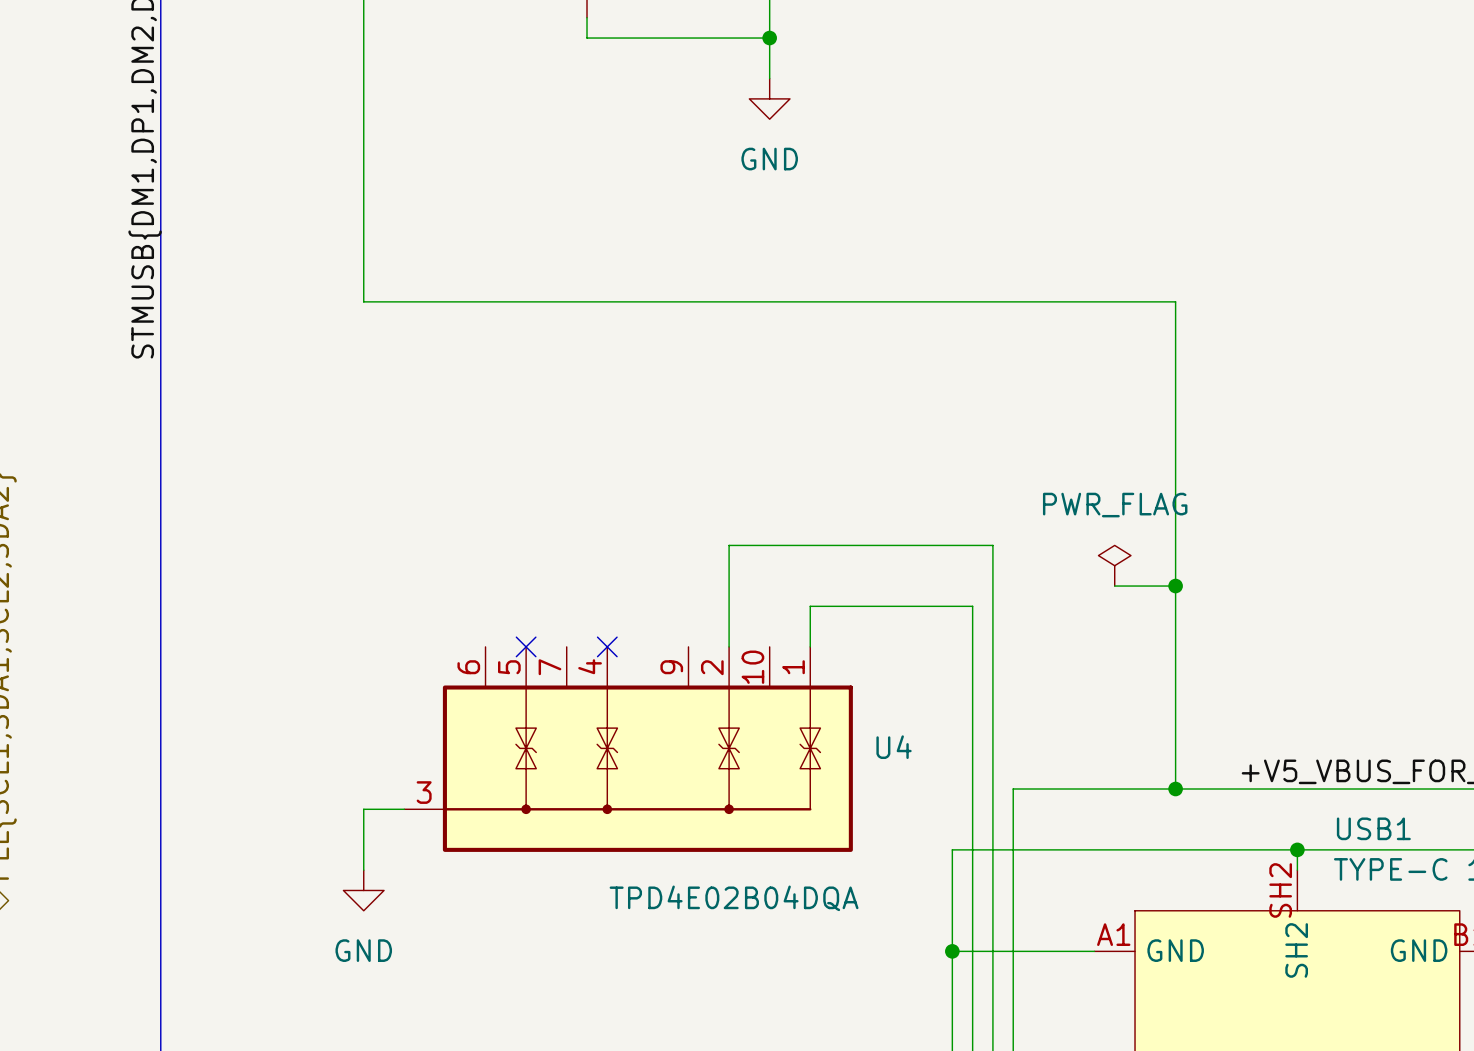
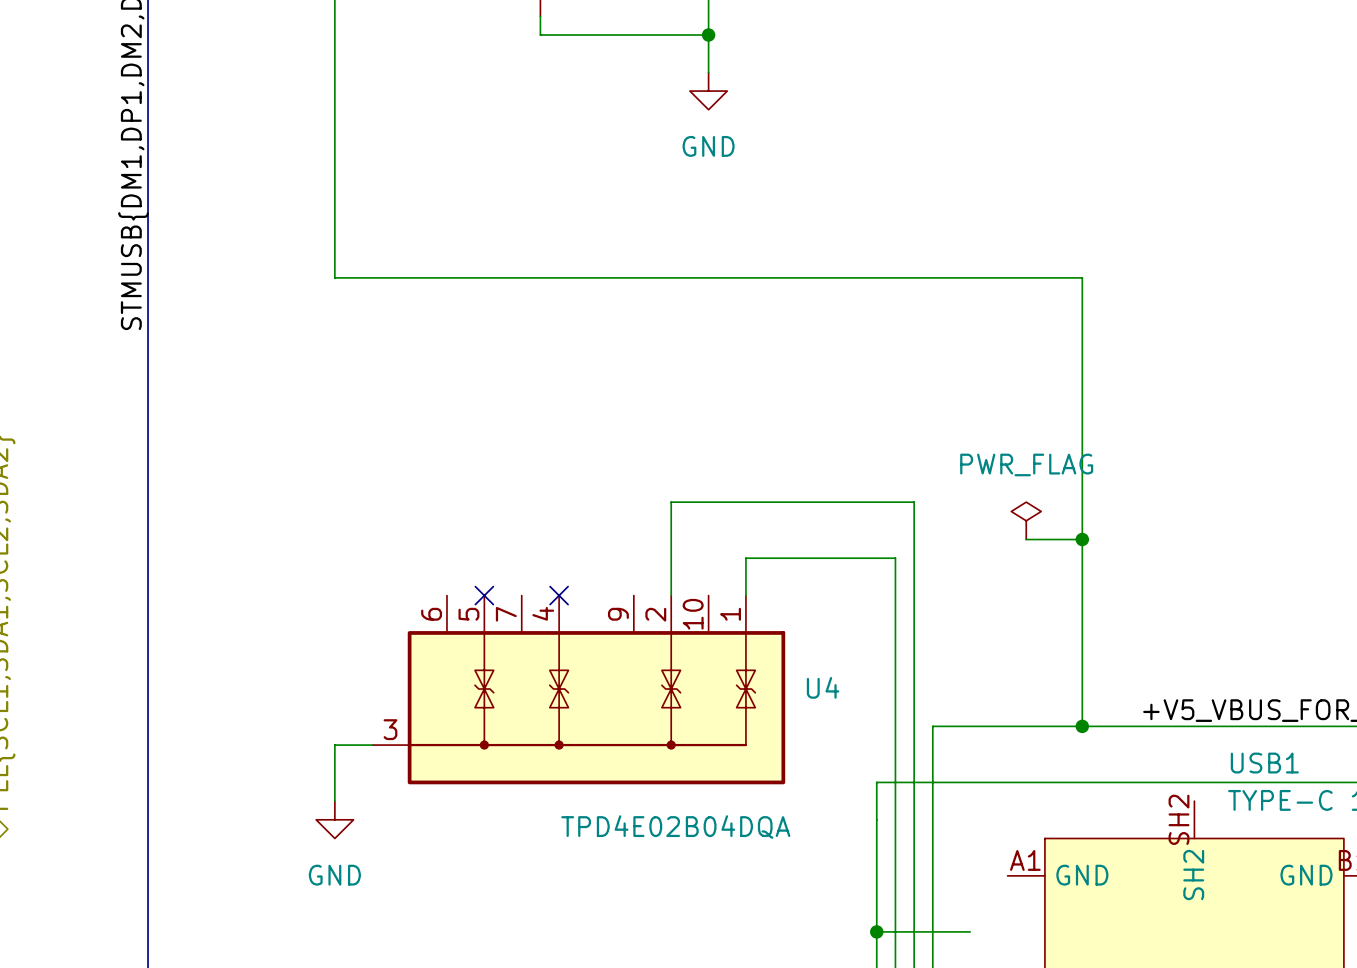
wire: (1297, 849) (1297, 870) -> none
junction: (1297, 849) -> none
wire: (952, 951) (1094, 951) -> none
junction position: (952, 951) -> (876, 931)
wire: none -> (876, 931) (970, 931)

